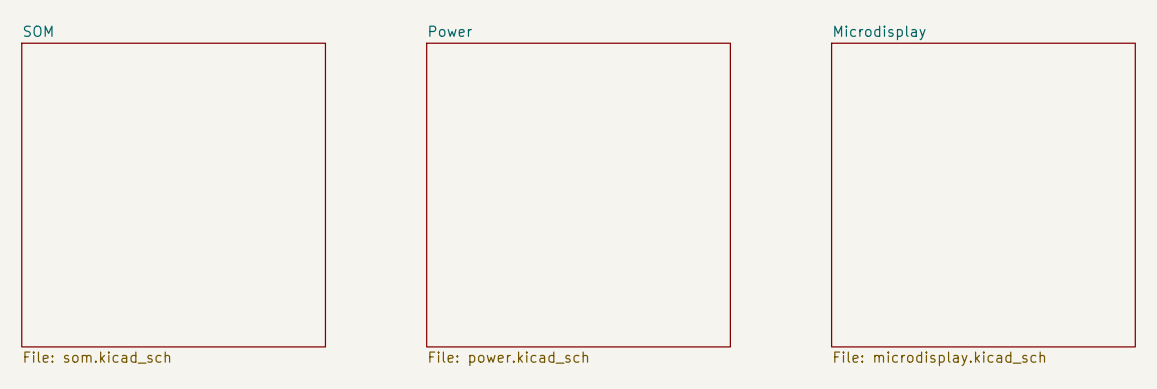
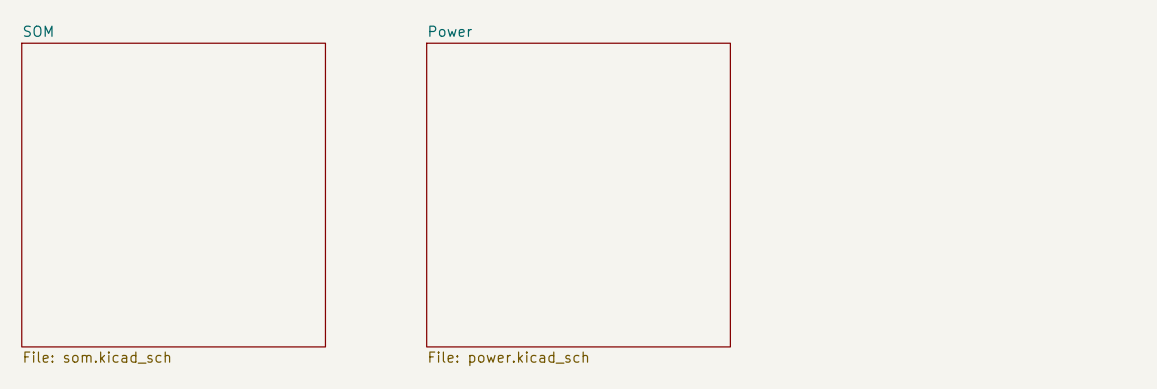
sheet Microdisplay: File: microdisplay.kicad_sch (983, 195) -> none

